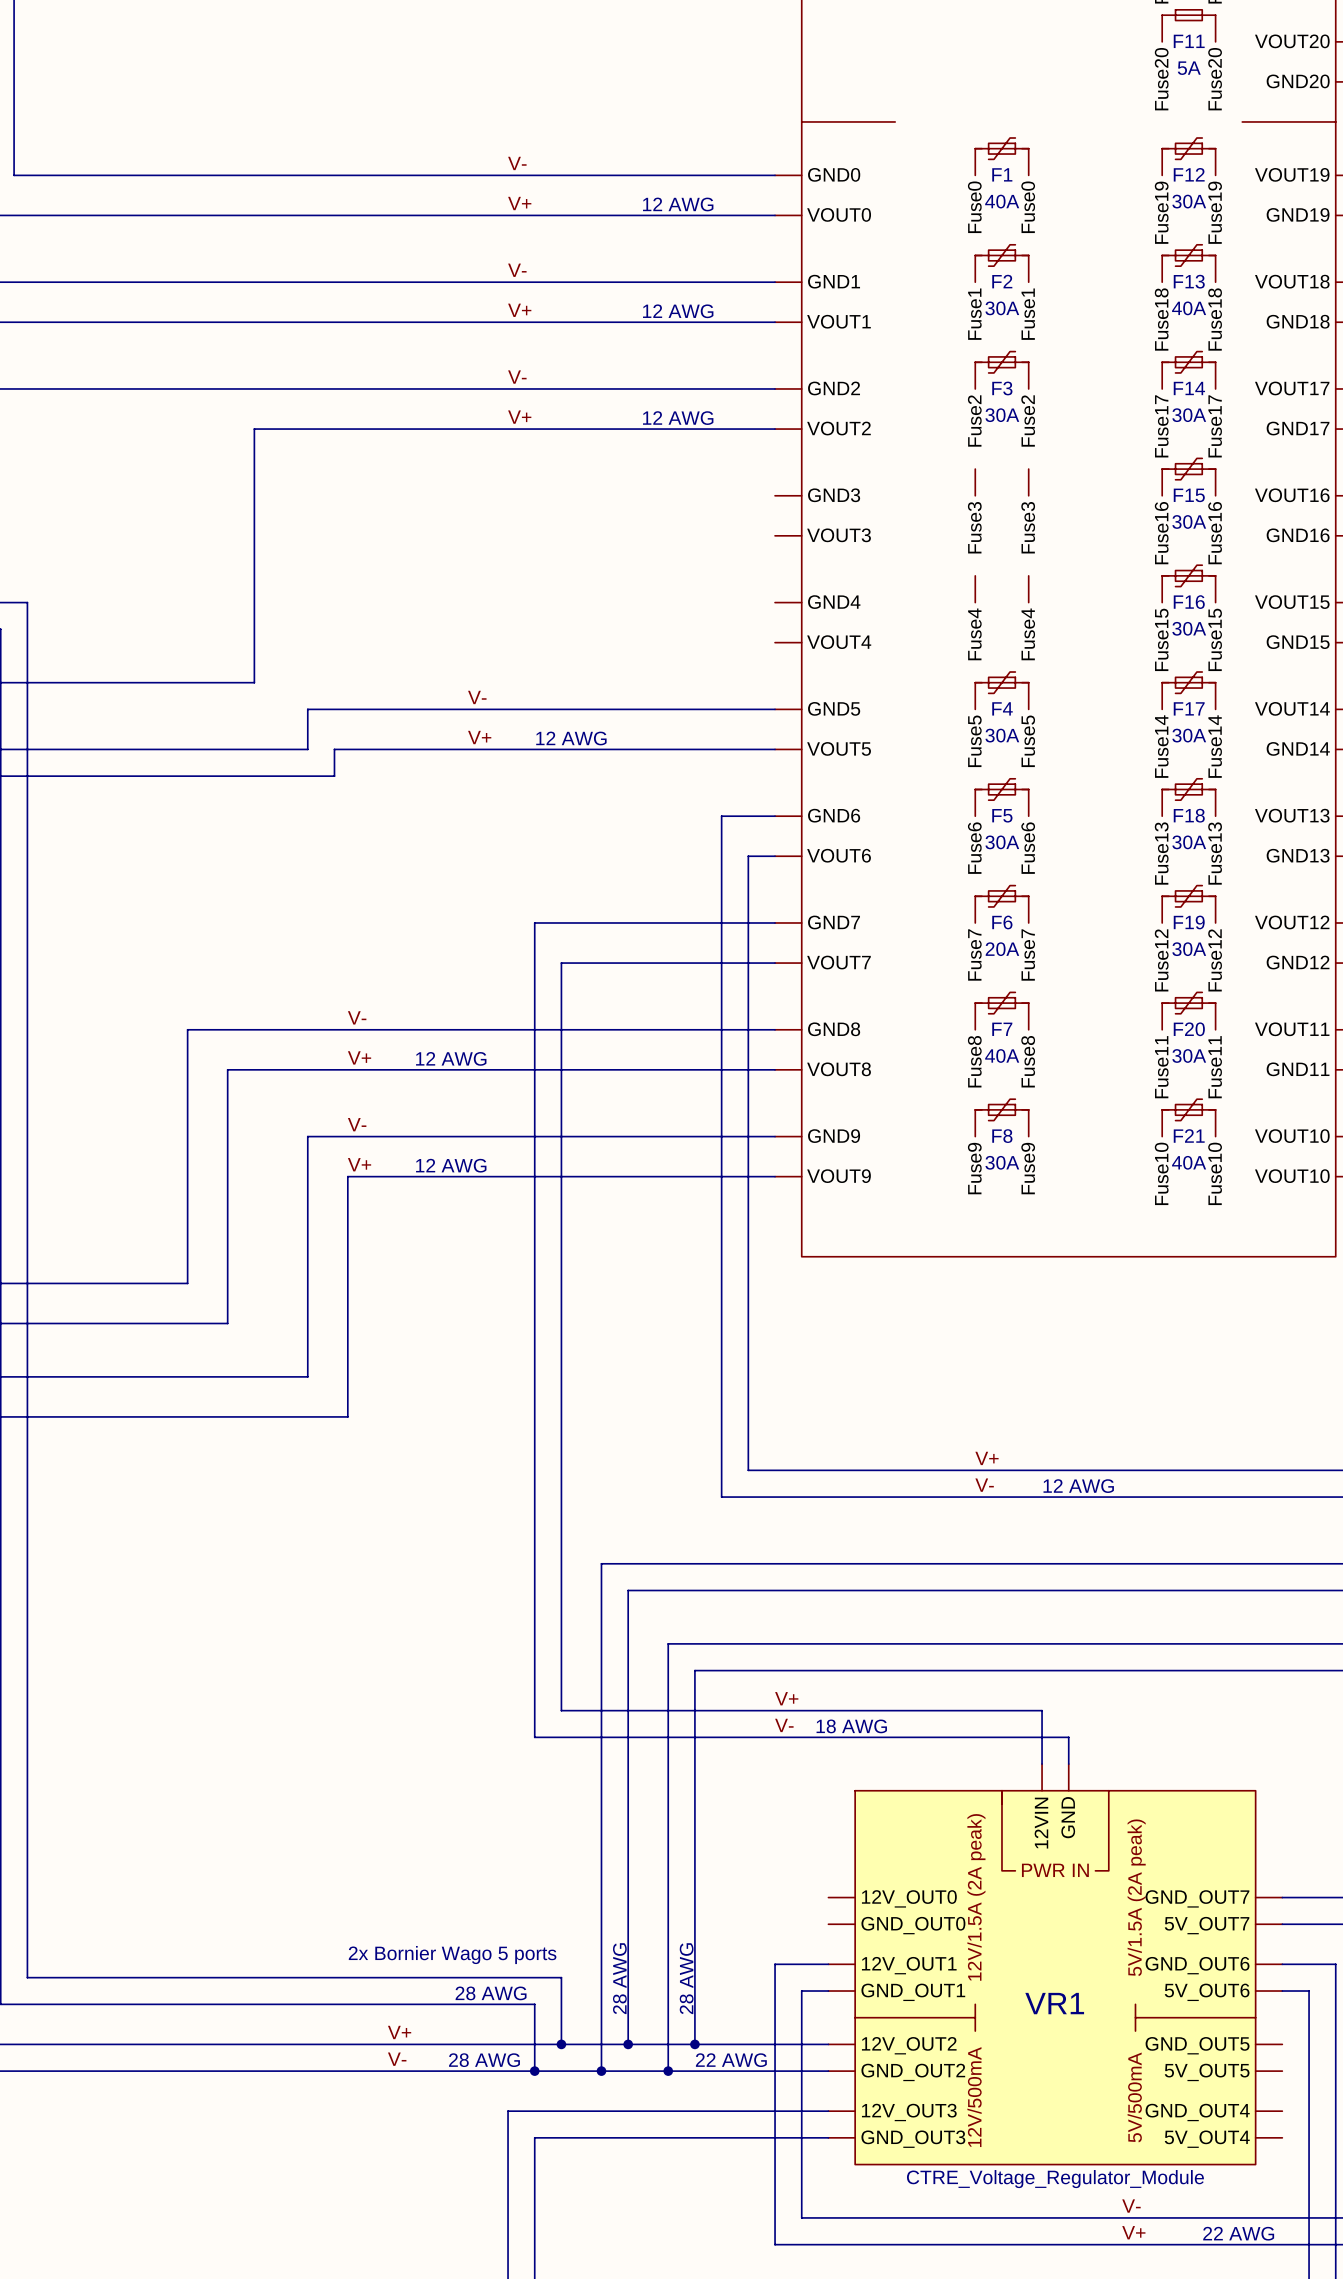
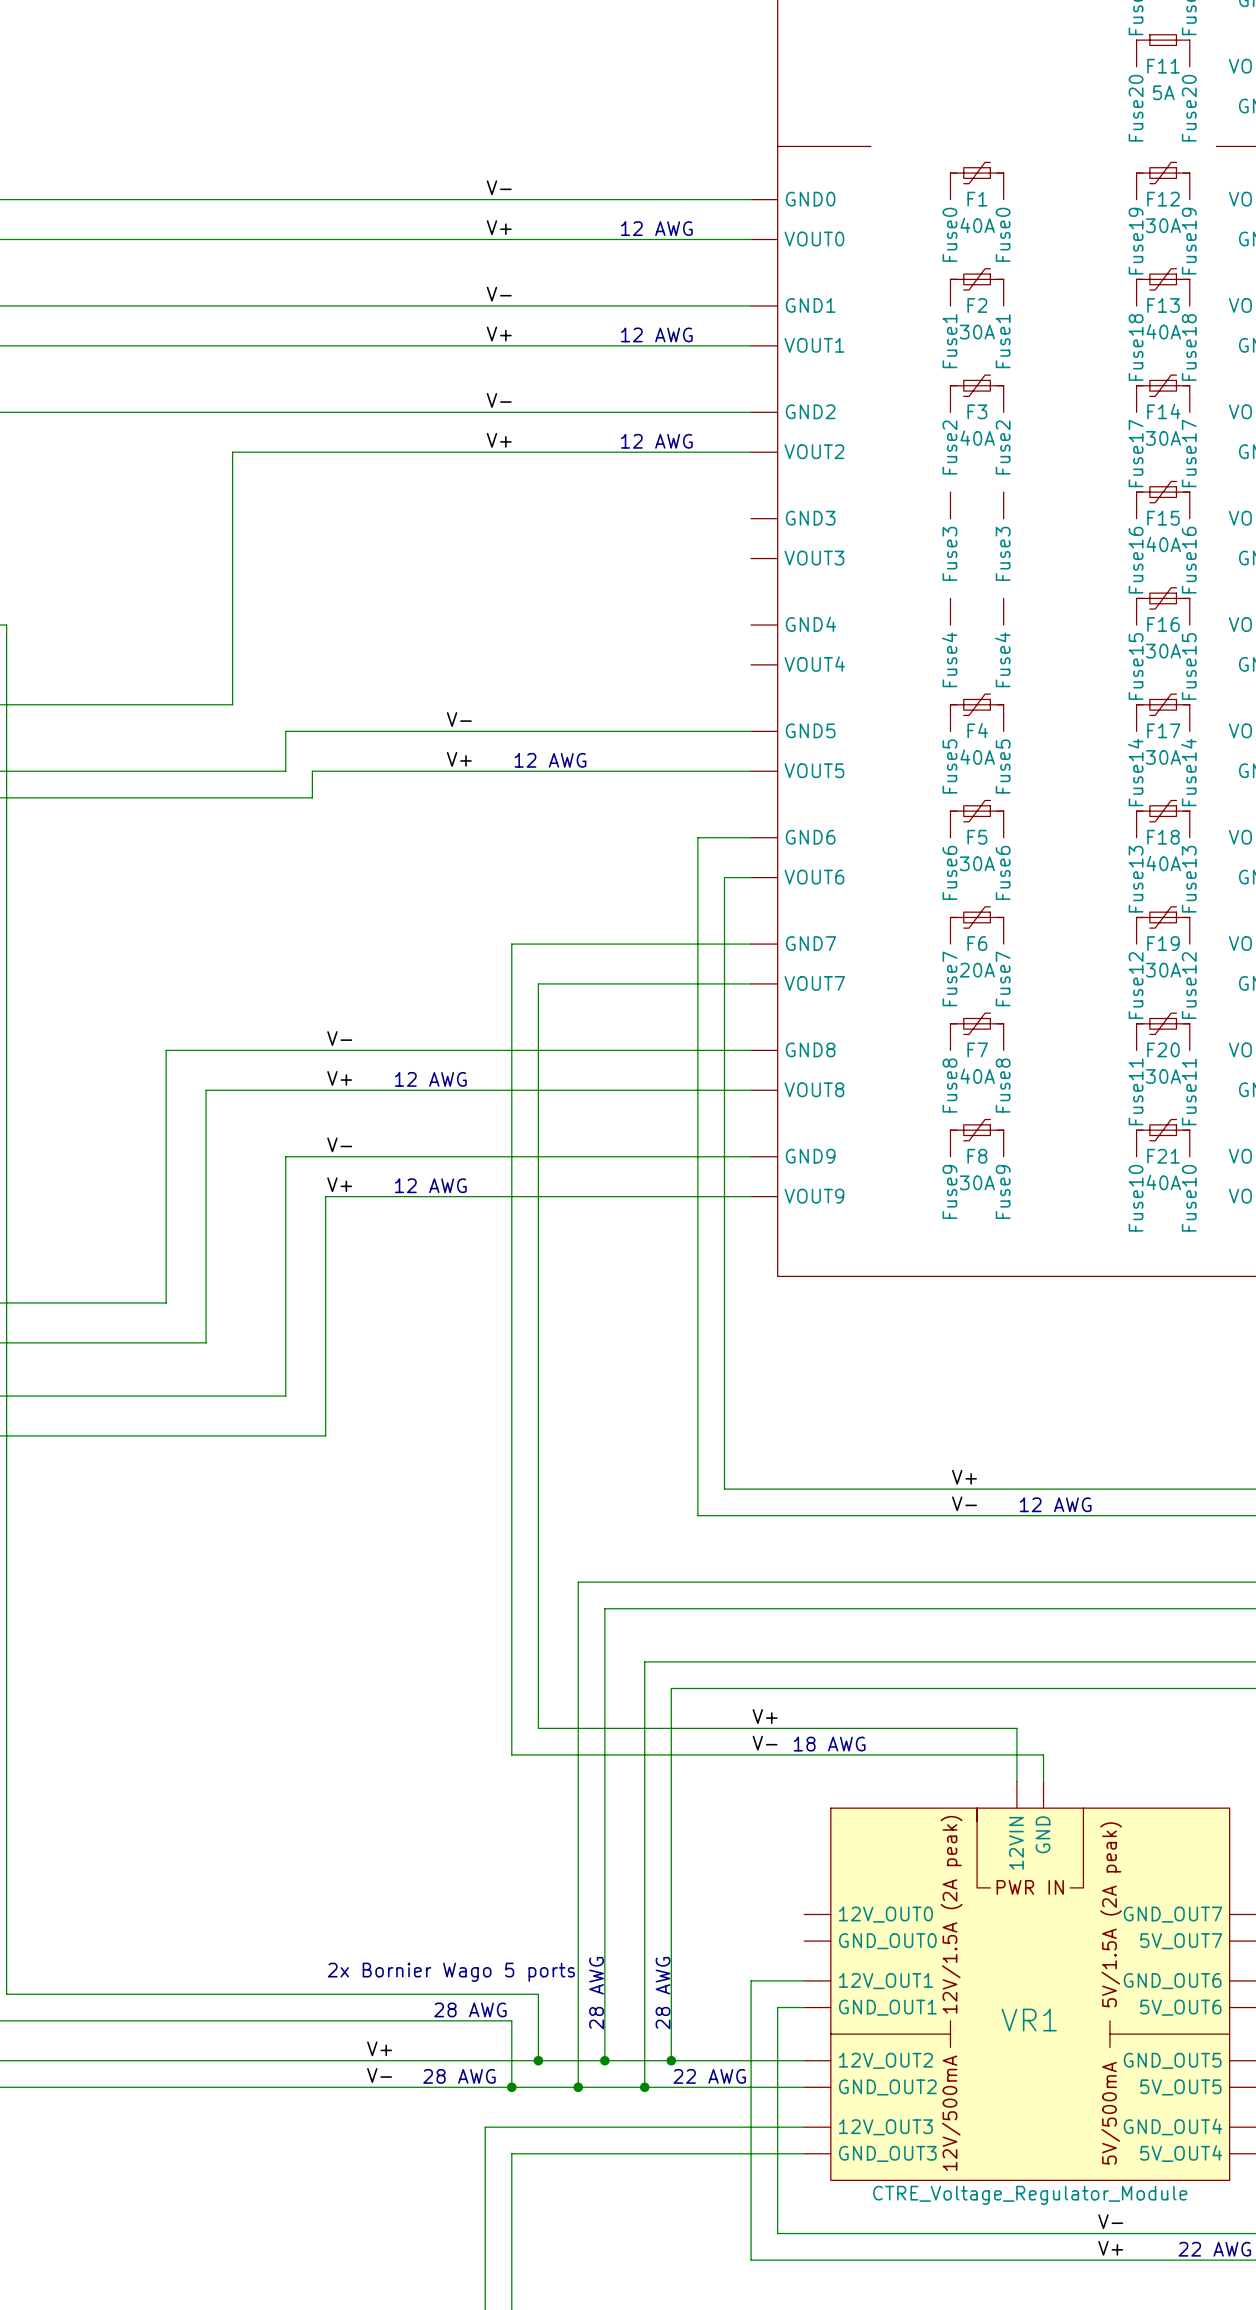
F3 value: 30A (1002, 415) -> 40A (977, 438)
F15 value: 30A (1189, 521) -> 40A (1163, 544)
F4 value: 30A (1002, 735) -> 40A (977, 757)
F18 value: 30A (1189, 842) -> 40A (1163, 863)

